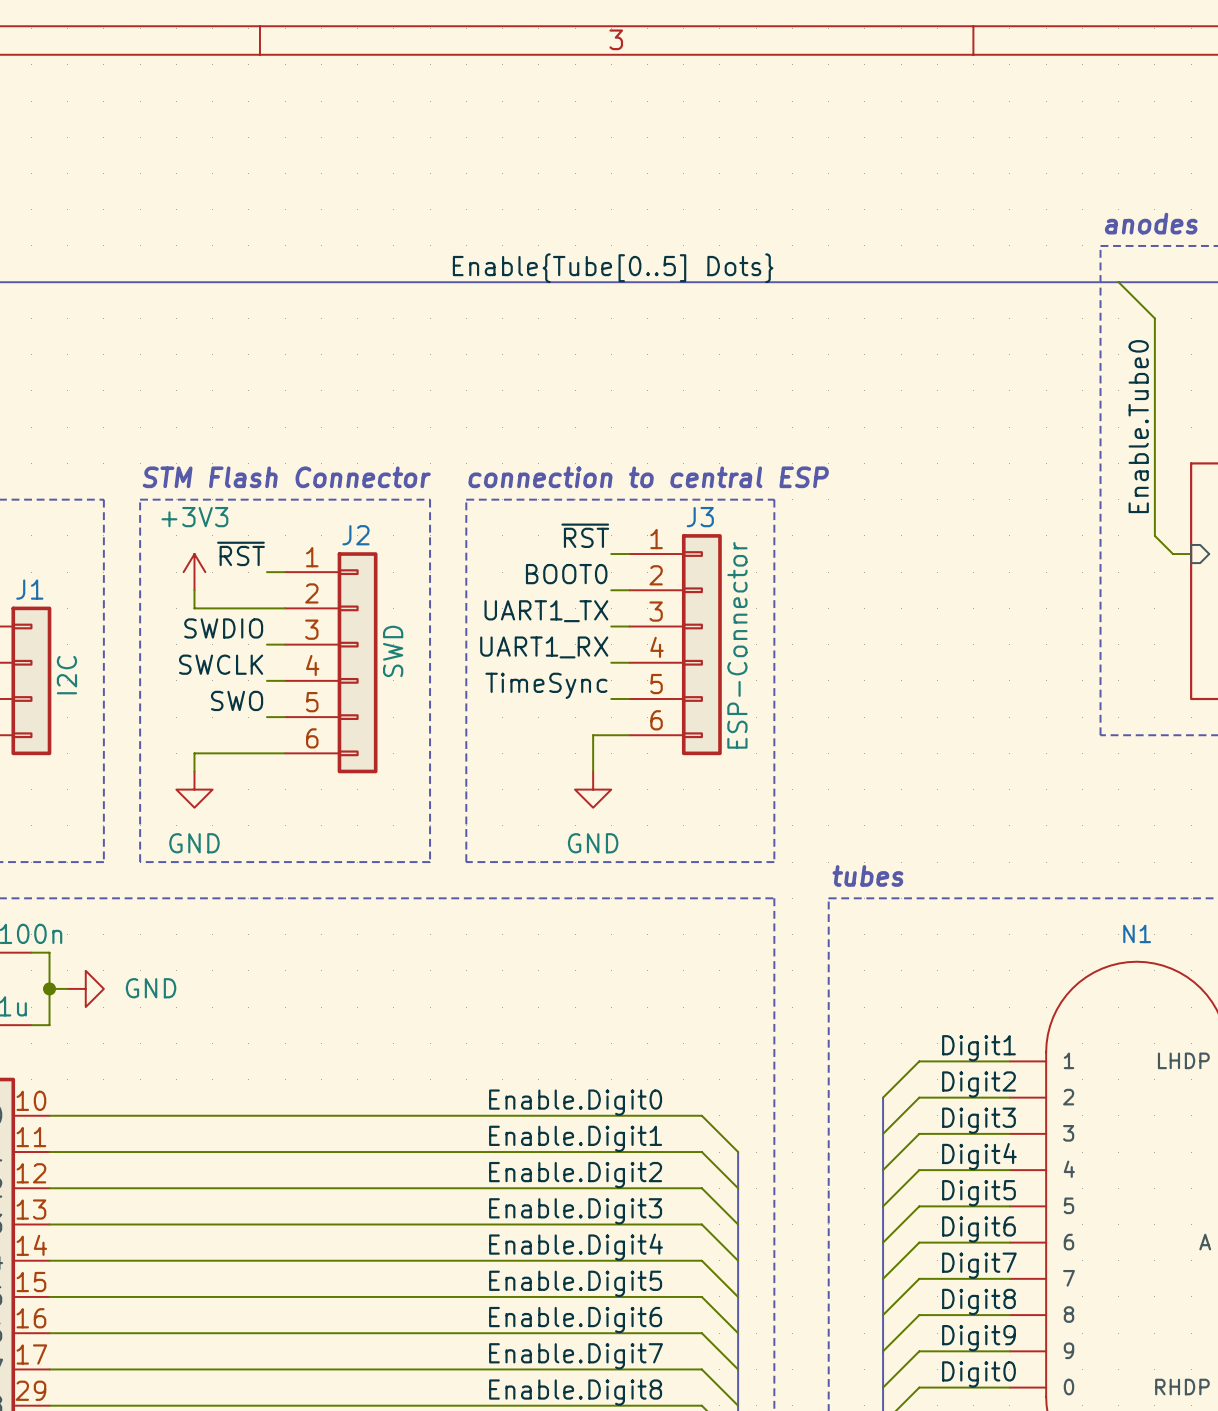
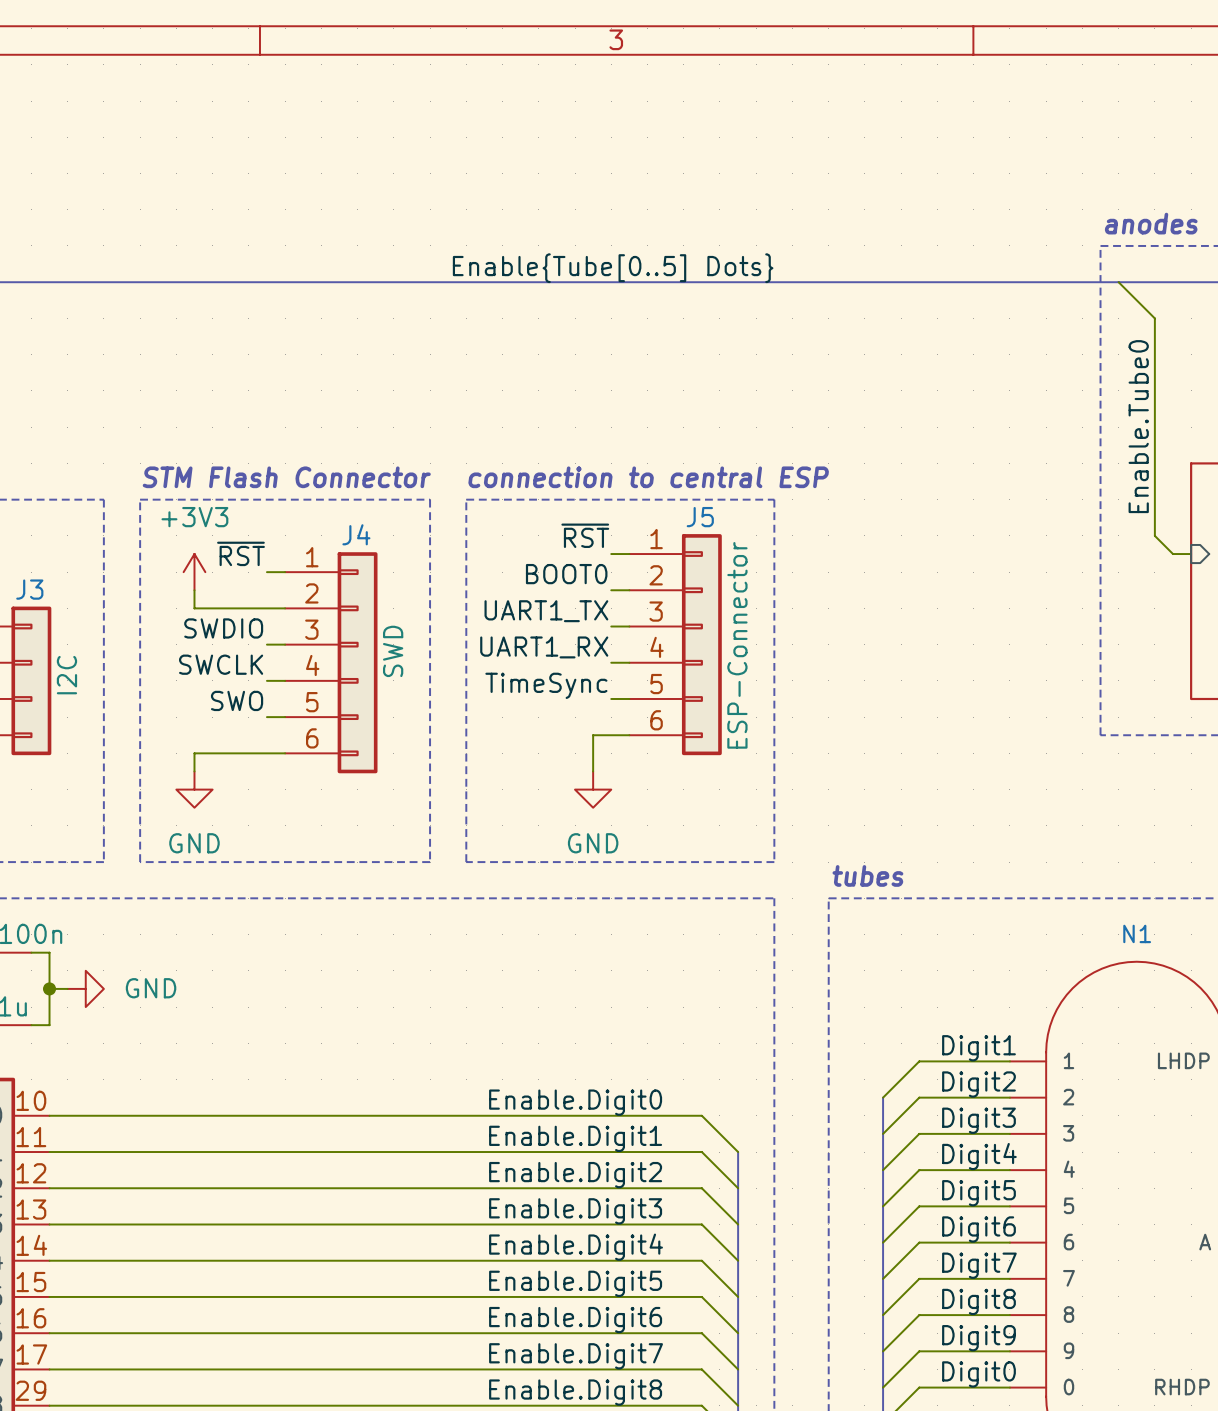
J3 name: J3 (700, 517) -> J5 (700, 517)
J2 name: J2 (355, 535) -> J4 (356, 534)
J1 name: J1 (29, 589) -> J3 (29, 589)

